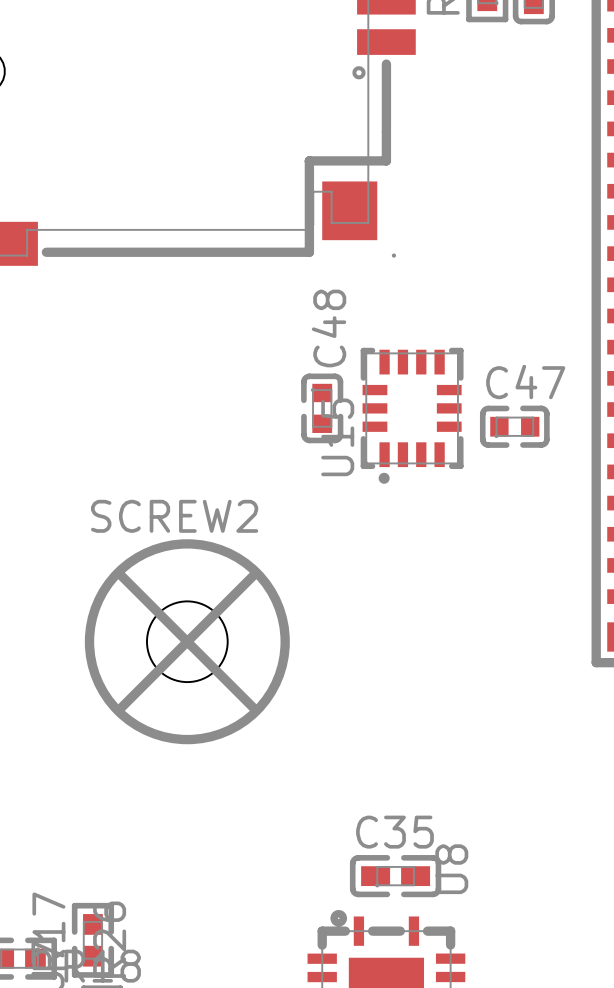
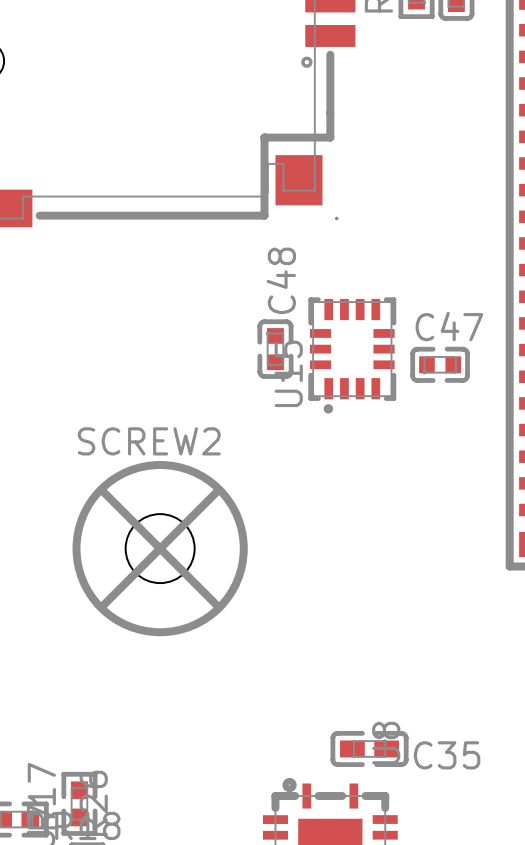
C35 name position: C35 (394, 832) -> C35 (447, 755)
C35 rotation: 0° (395, 876) -> 180° (369, 748)

